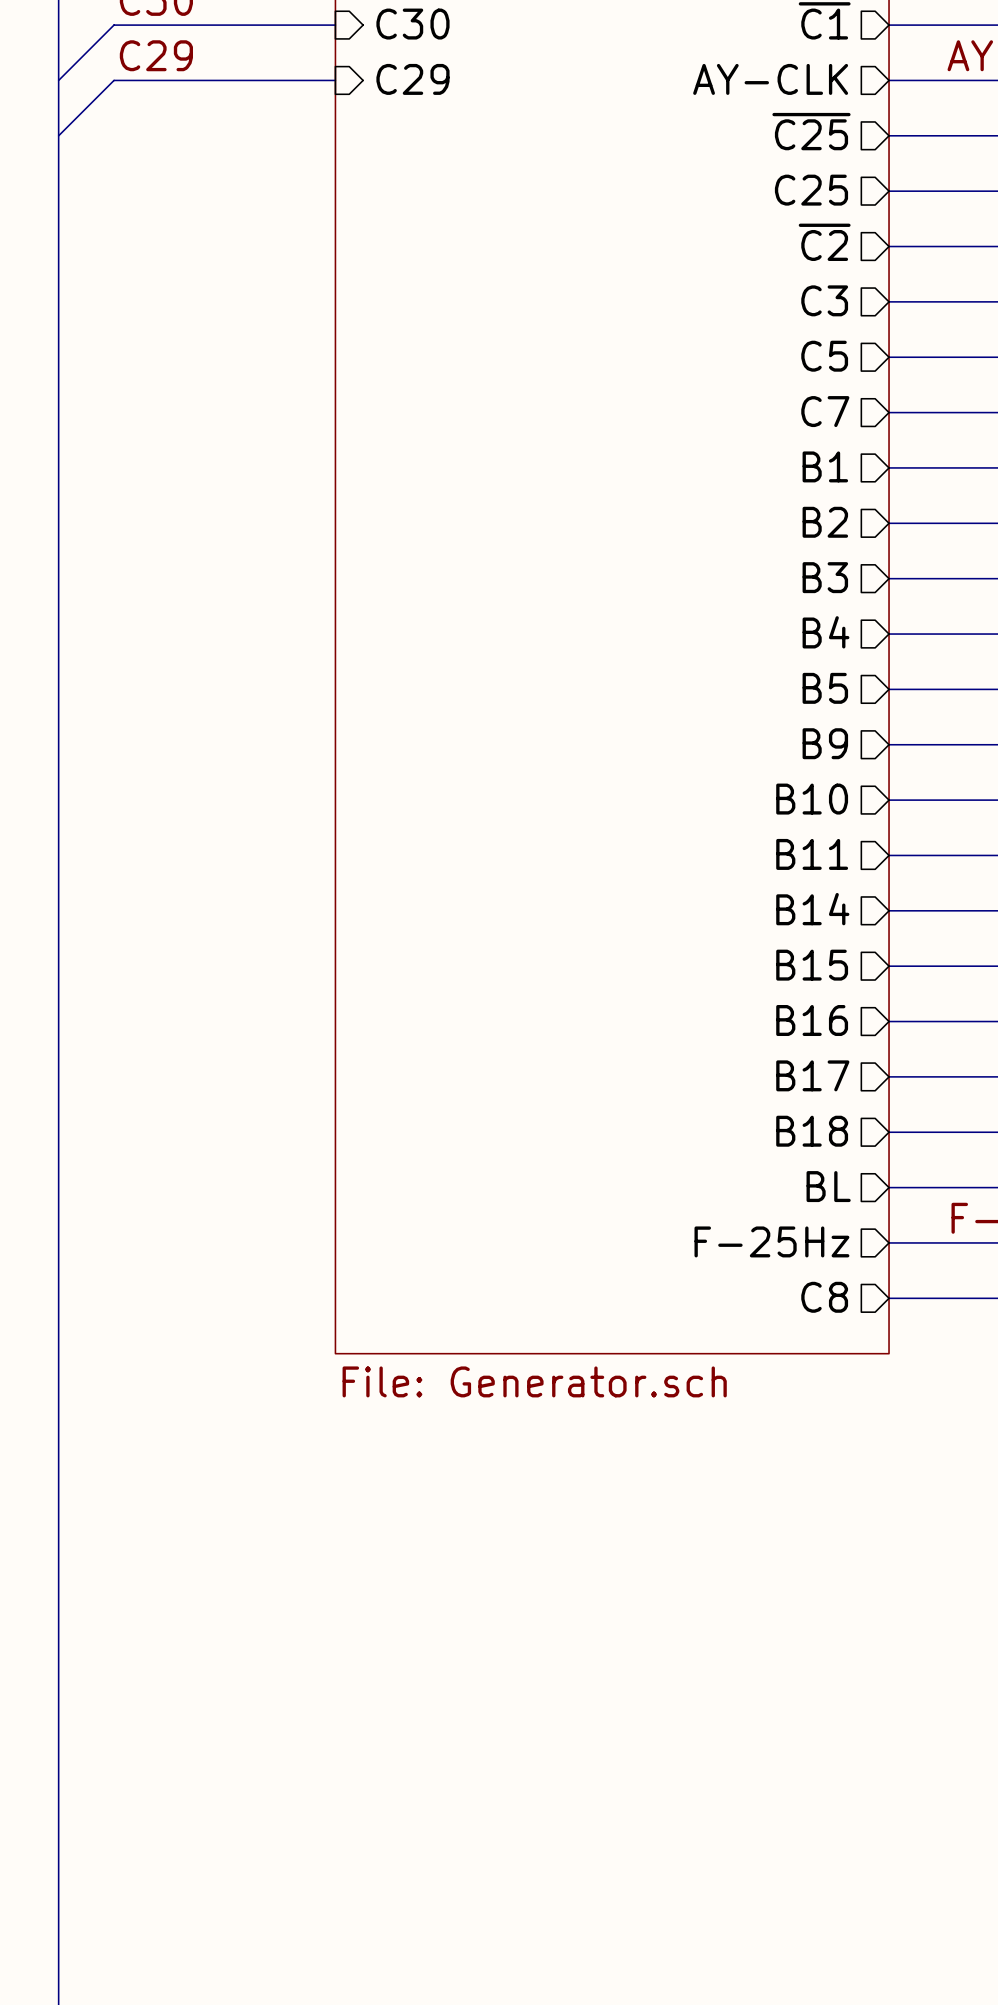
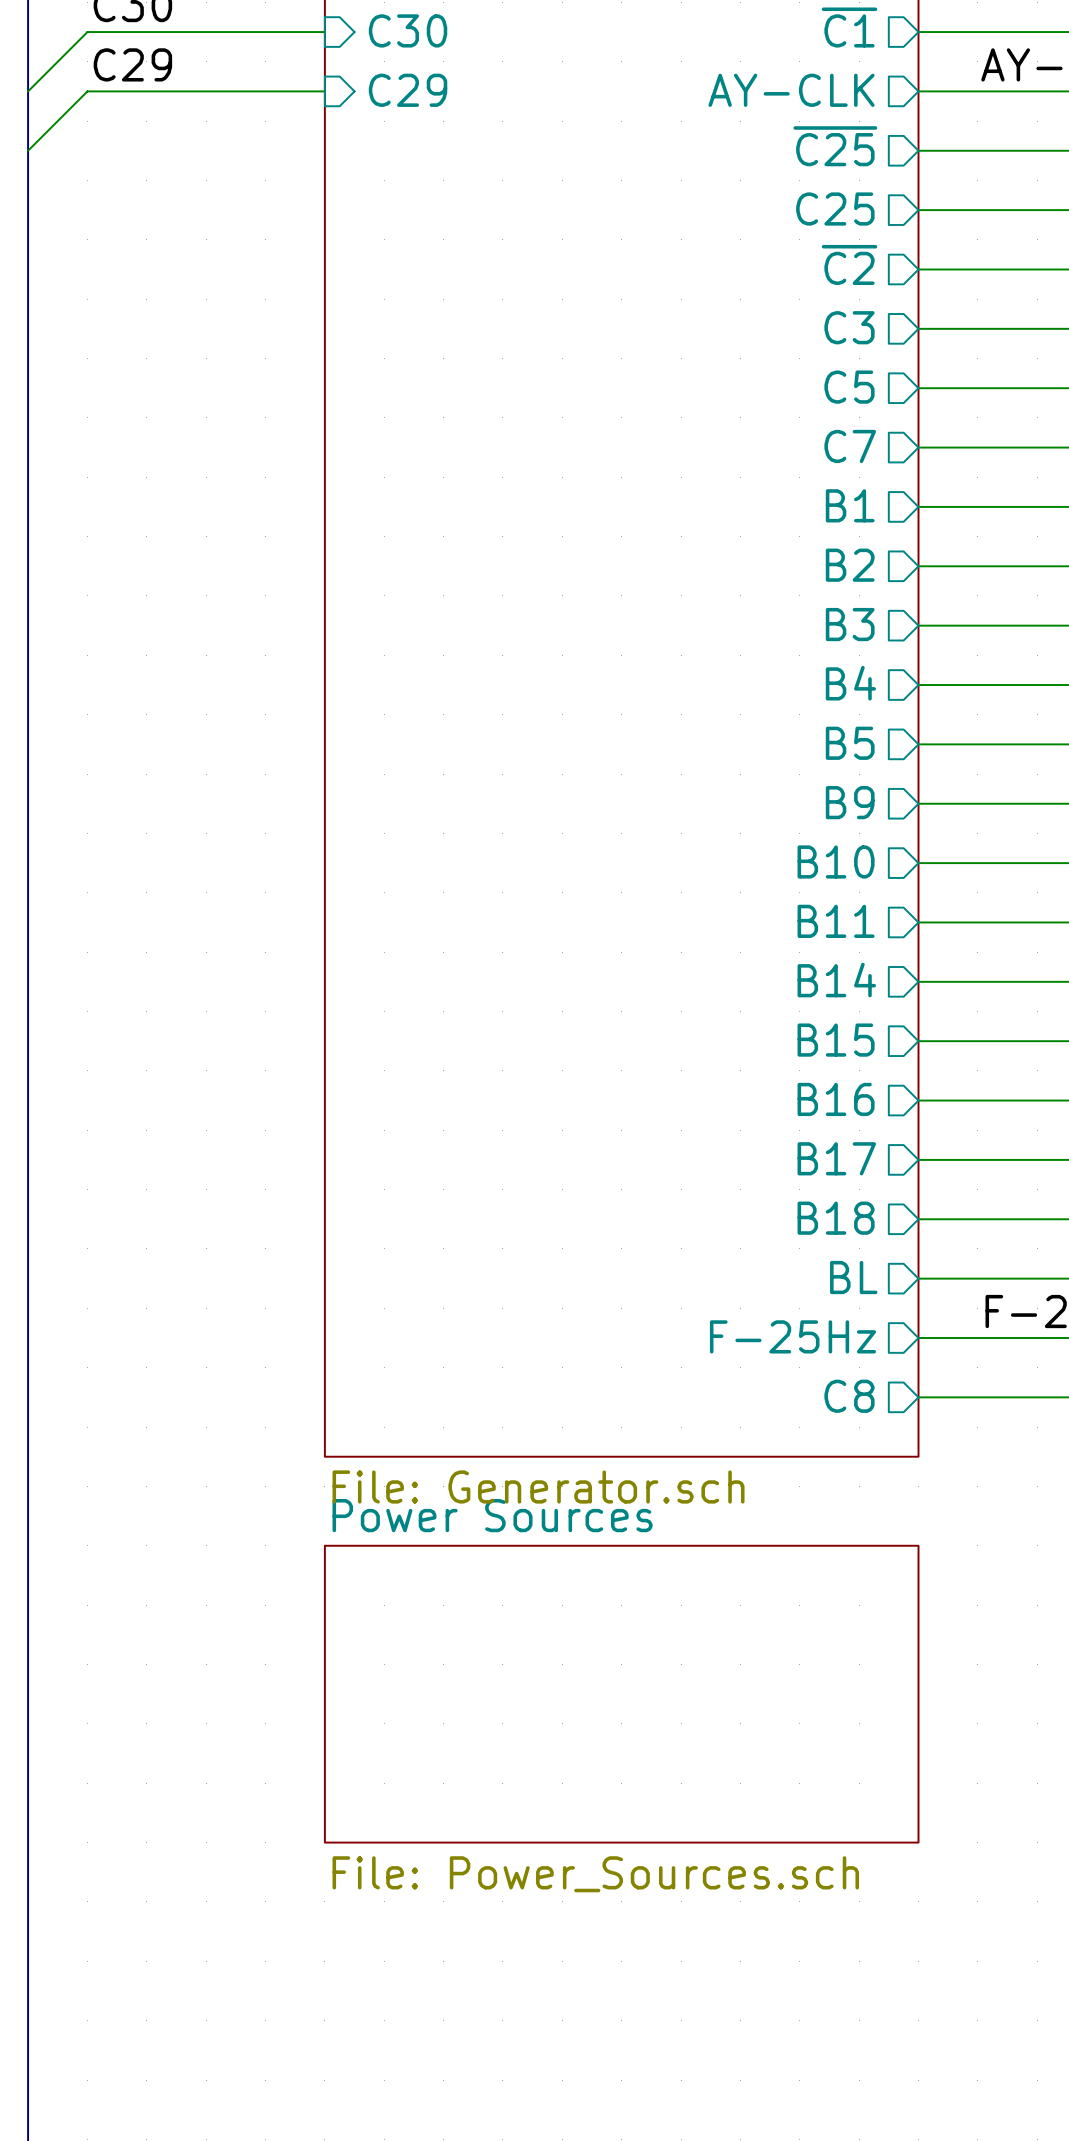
sheet Power Sources: none -> File: Power_Sources.sch (621, 1694)

